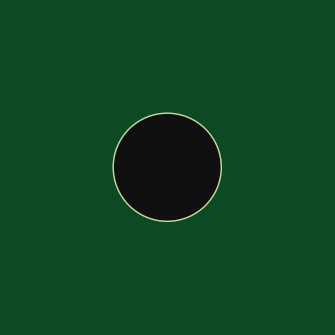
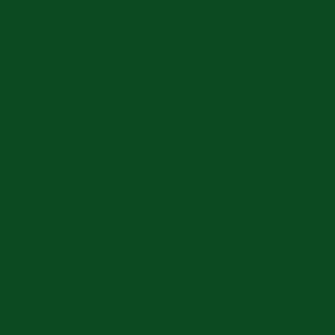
part: (167, 167) -> none

